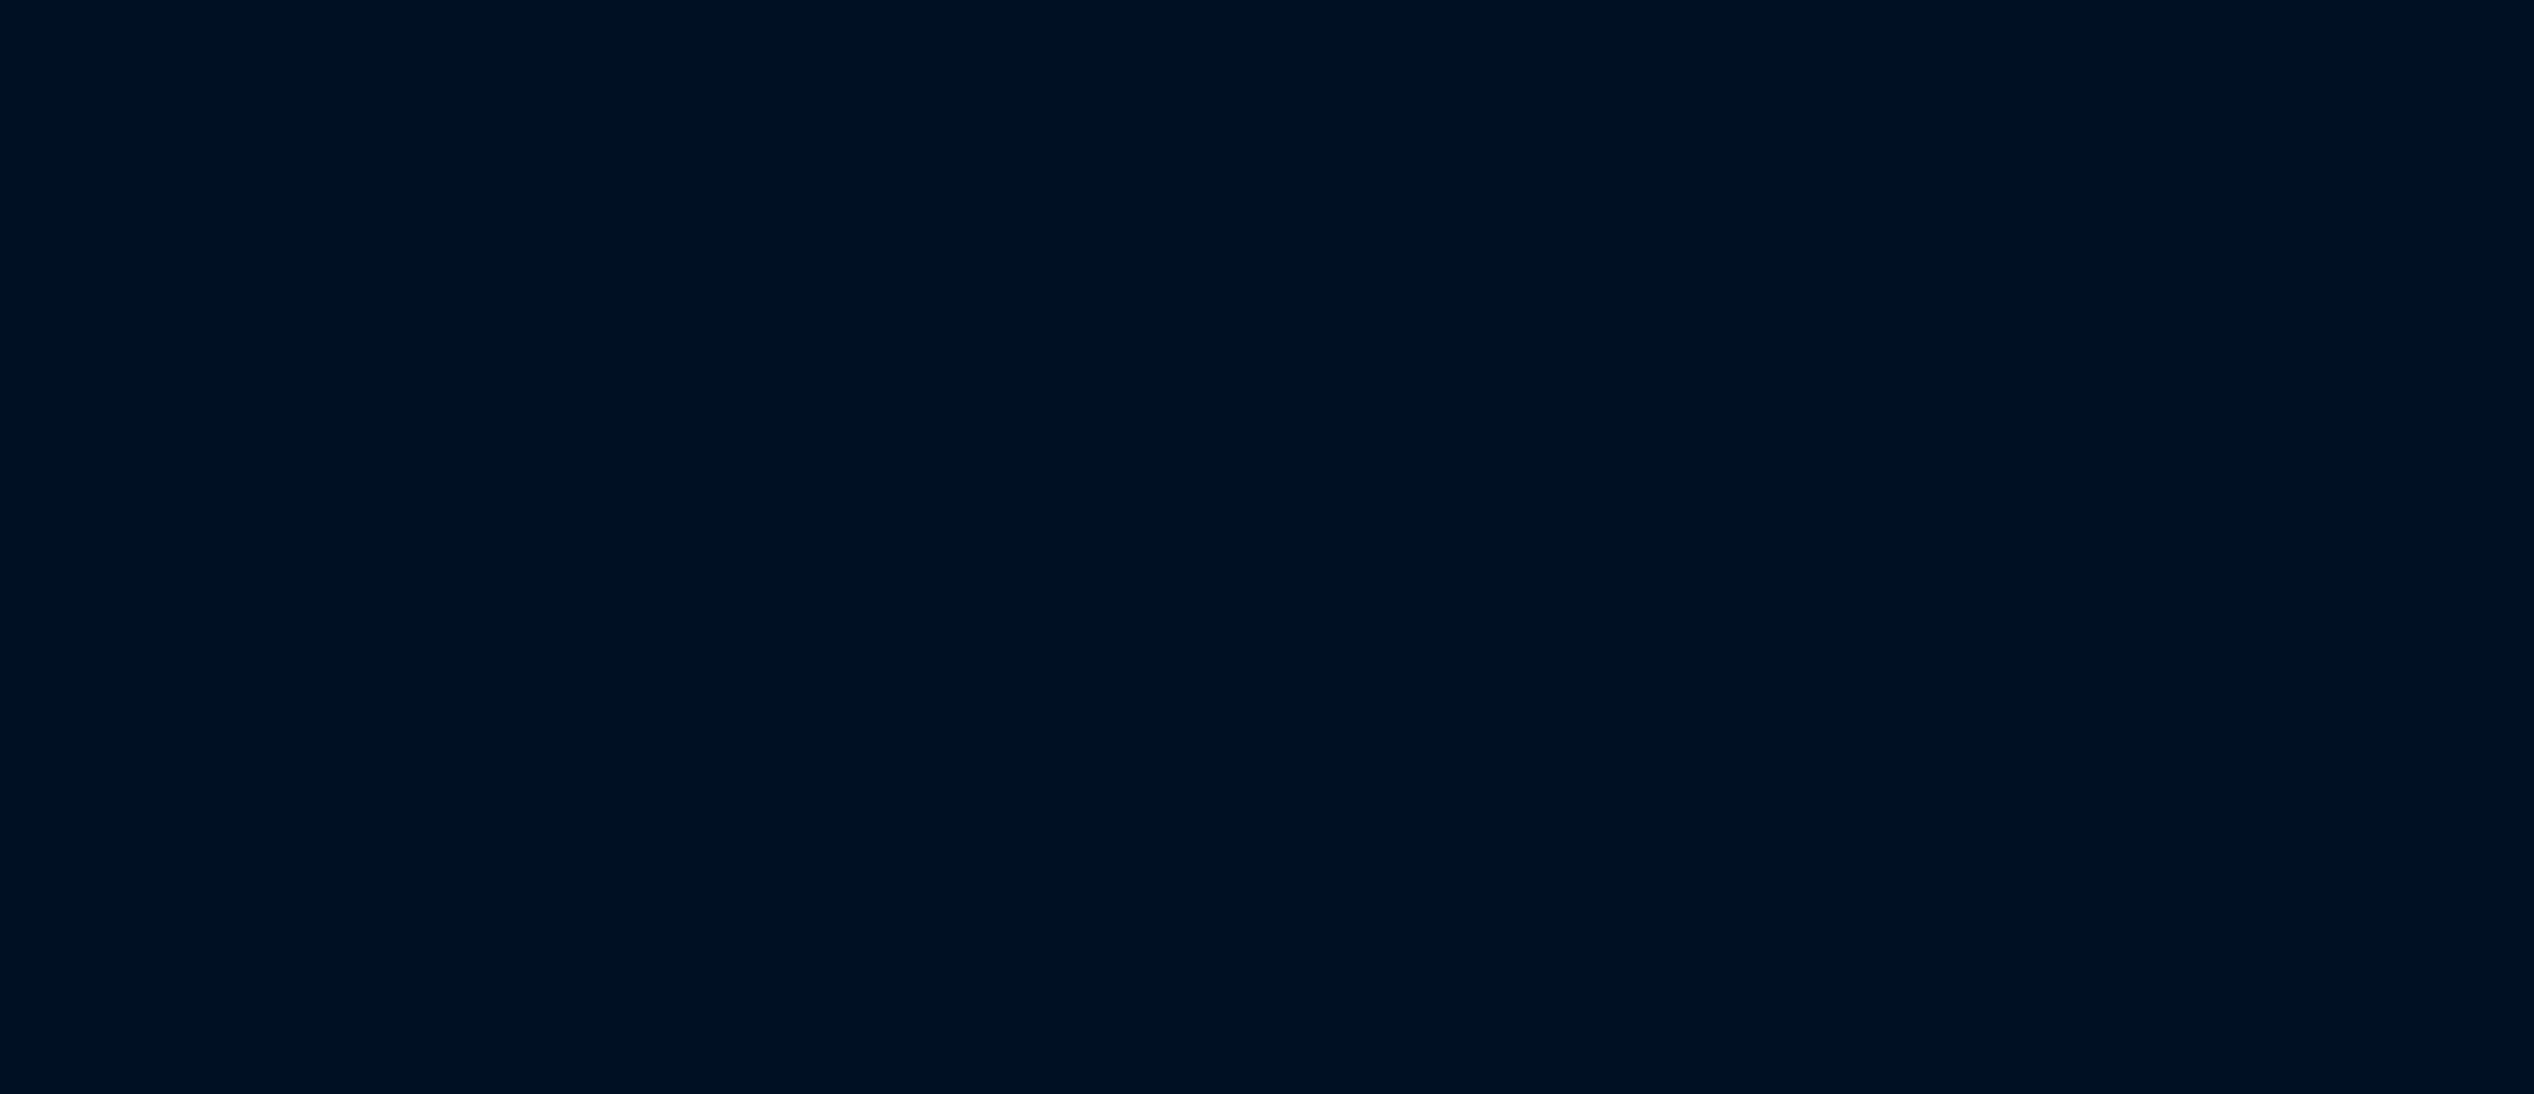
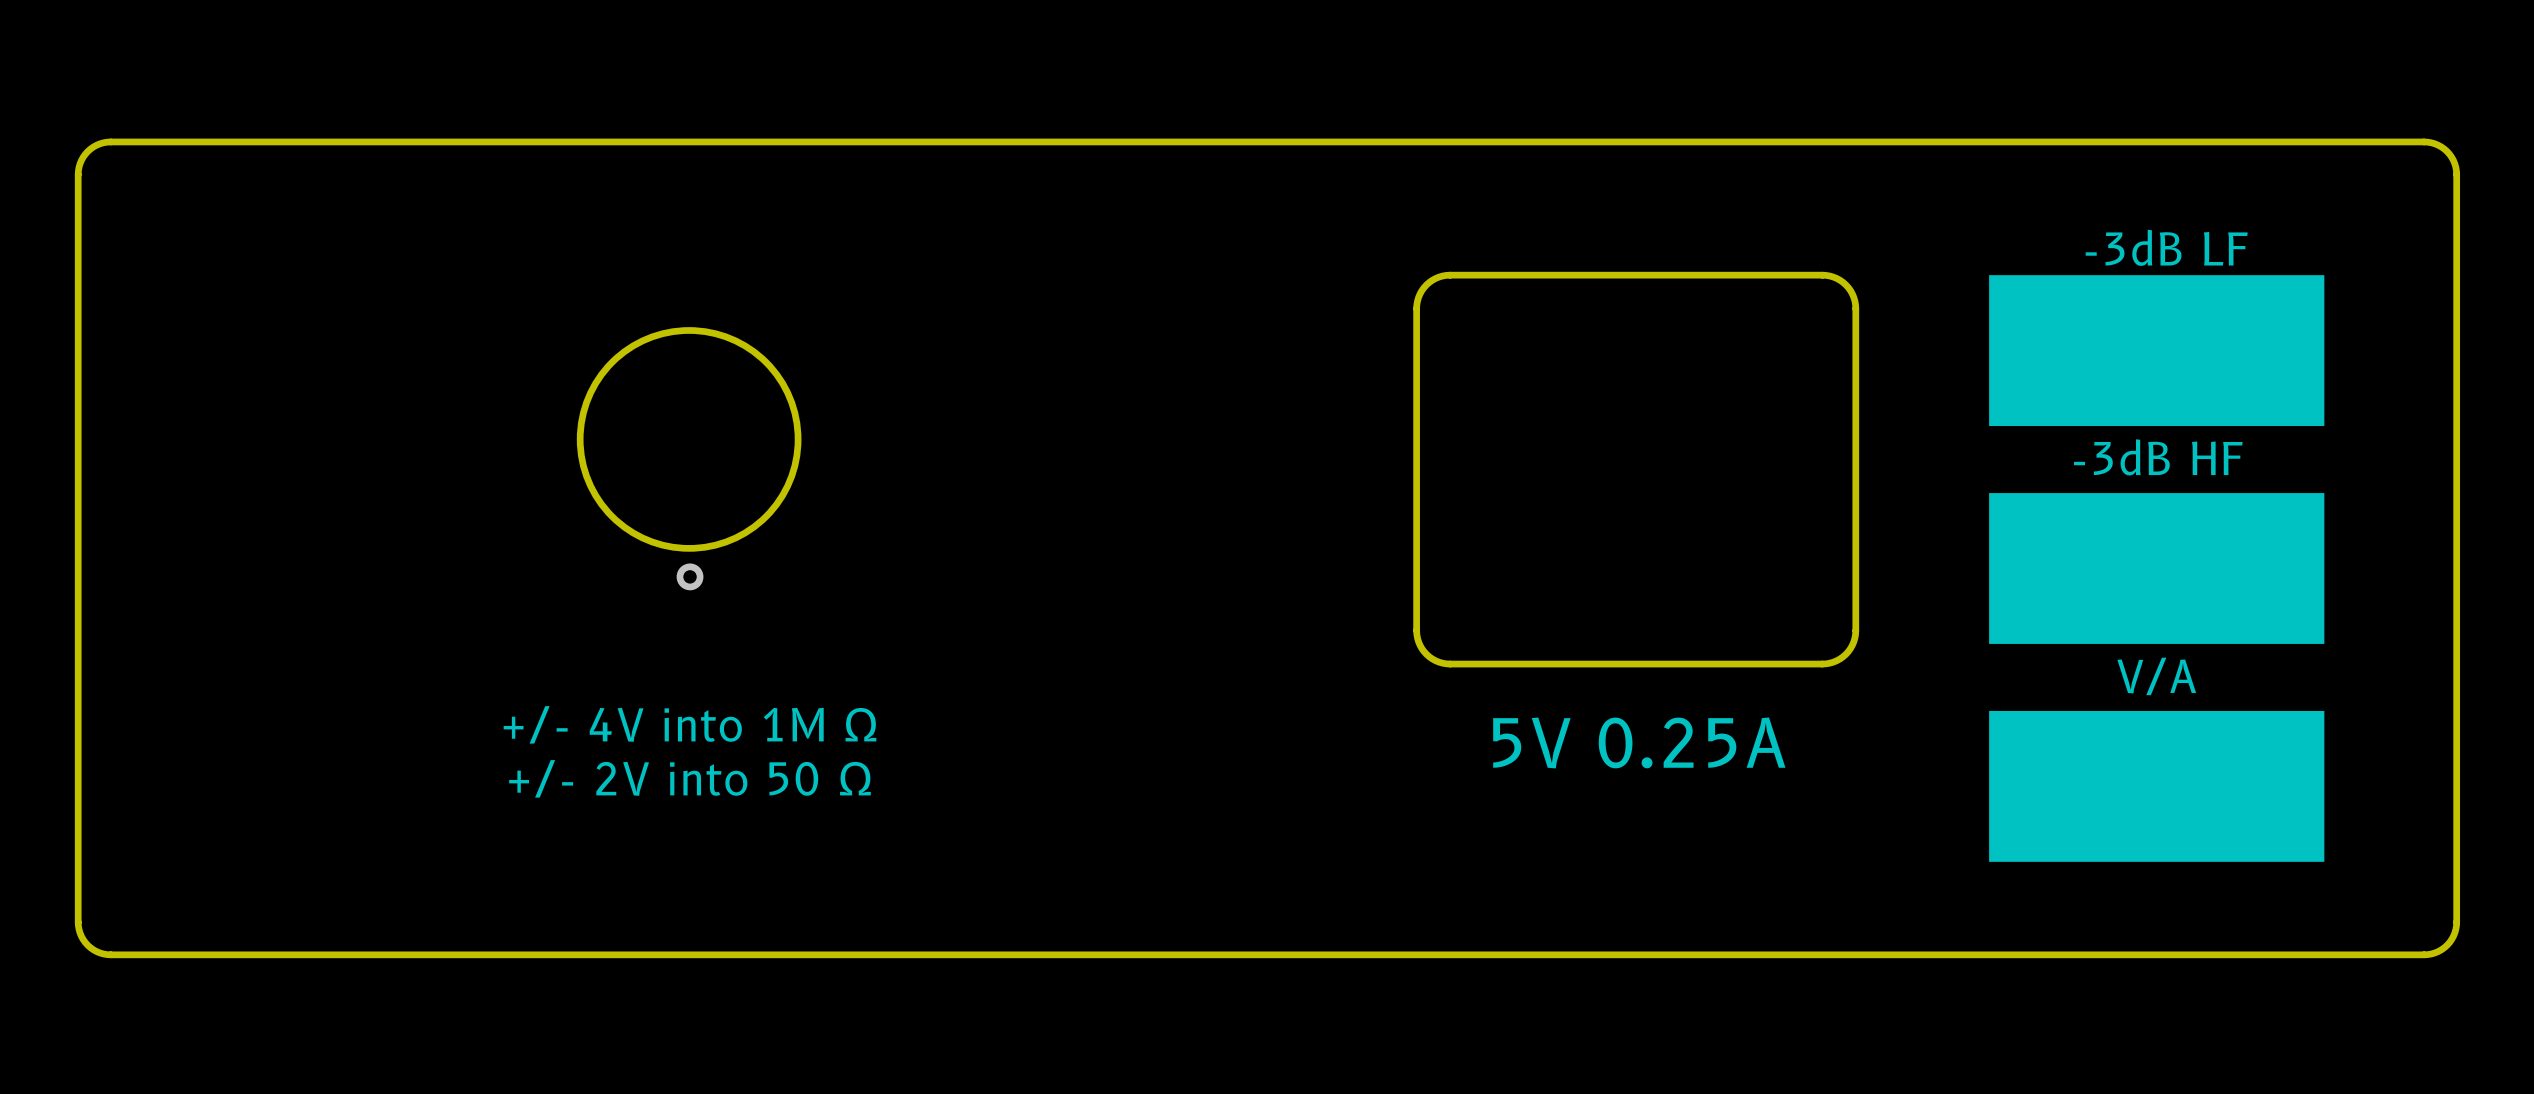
board edge: none -> (110, 141) (2424, 141) (2434, 143) (2449, 154) (2454, 163) (2456, 174) (2456, 922) (2454, 932) (2444, 947) (2434, 952) (2424, 954) (110, 954) (100, 952) (85, 942) (80, 932) (78, 922) (78, 174) (80, 163) (87, 151) (96, 145) (110, 141)
text: none -> -3dB LF (2166, 247)
board edge: none -> (1450, 275) (1822, 275) (1836, 278) (1845, 284) (1852, 294) (1855, 308) (1855, 630) (1852, 645) (1845, 654) (1836, 660) (1822, 664) (1450, 664) (1439, 662) (1426, 654) (1419, 645) (1416, 630) (1416, 304) (1419, 294) (1429, 282) (1439, 277) (1450, 275)
drawing: none -> [1989, 275, 2325, 427]
round board edge: none -> [576, 327, 802, 552]
text: none -> -3dB HF (2158, 457)
drawing: none -> [1989, 493, 2325, 644]
via: none -> (690, 576)
text: none -> V/A (2156, 676)
drawing: none -> [1989, 710, 2325, 862]
text: none -> +/- 4V into 1M Ω (689, 724)
text: none -> 5V 0.25A (1639, 742)
text: none -> +/- 2V into 50 Ω (689, 778)

